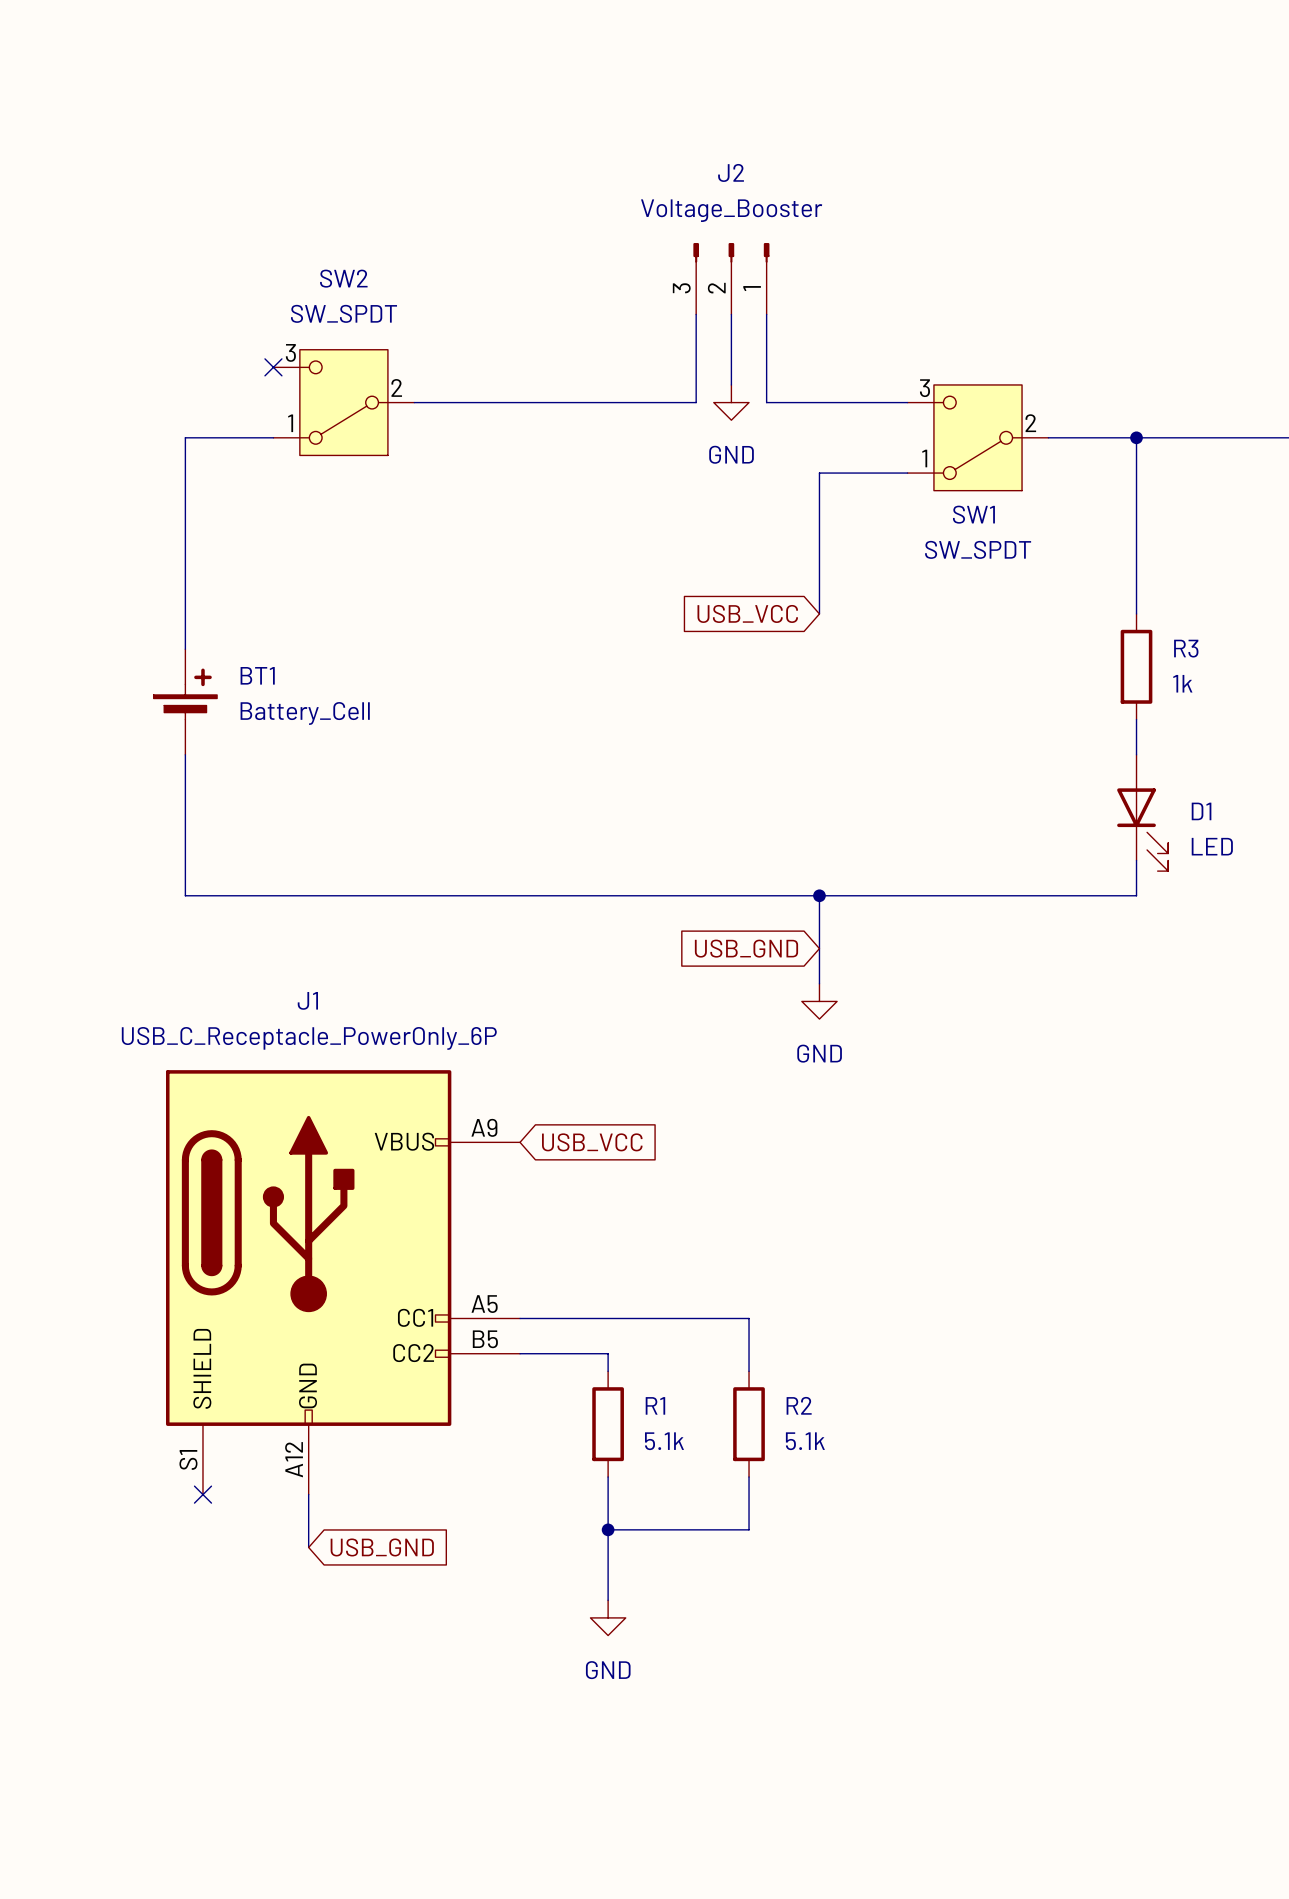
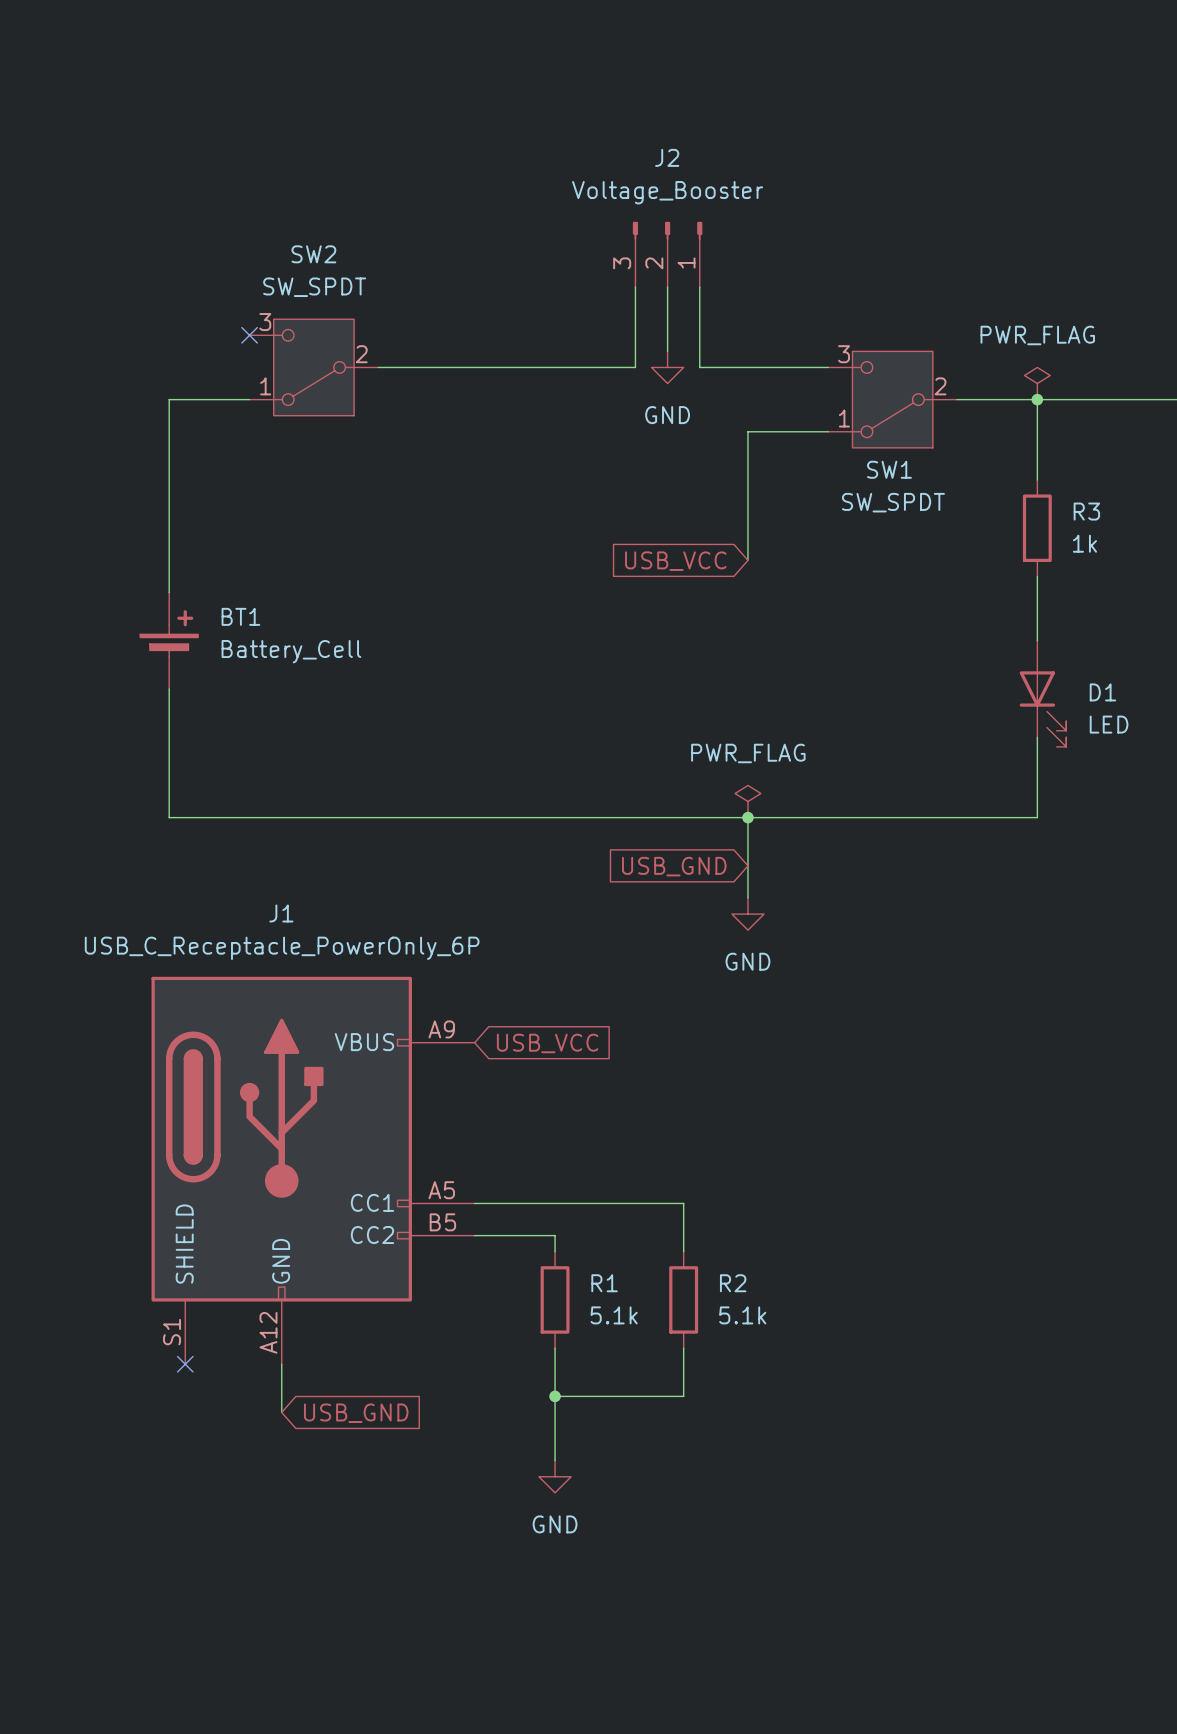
power symbol: none -> PWR_FLAG (1037, 383)
wire: (1136, 525) (1136, 613) -> none
wire: none -> (1037, 576) (1037, 640)
R3 position: (1136, 666) -> (1037, 528)
D1 position: (1142, 812) -> (1042, 693)
power symbol: none -> PWR_FLAG (747, 801)

